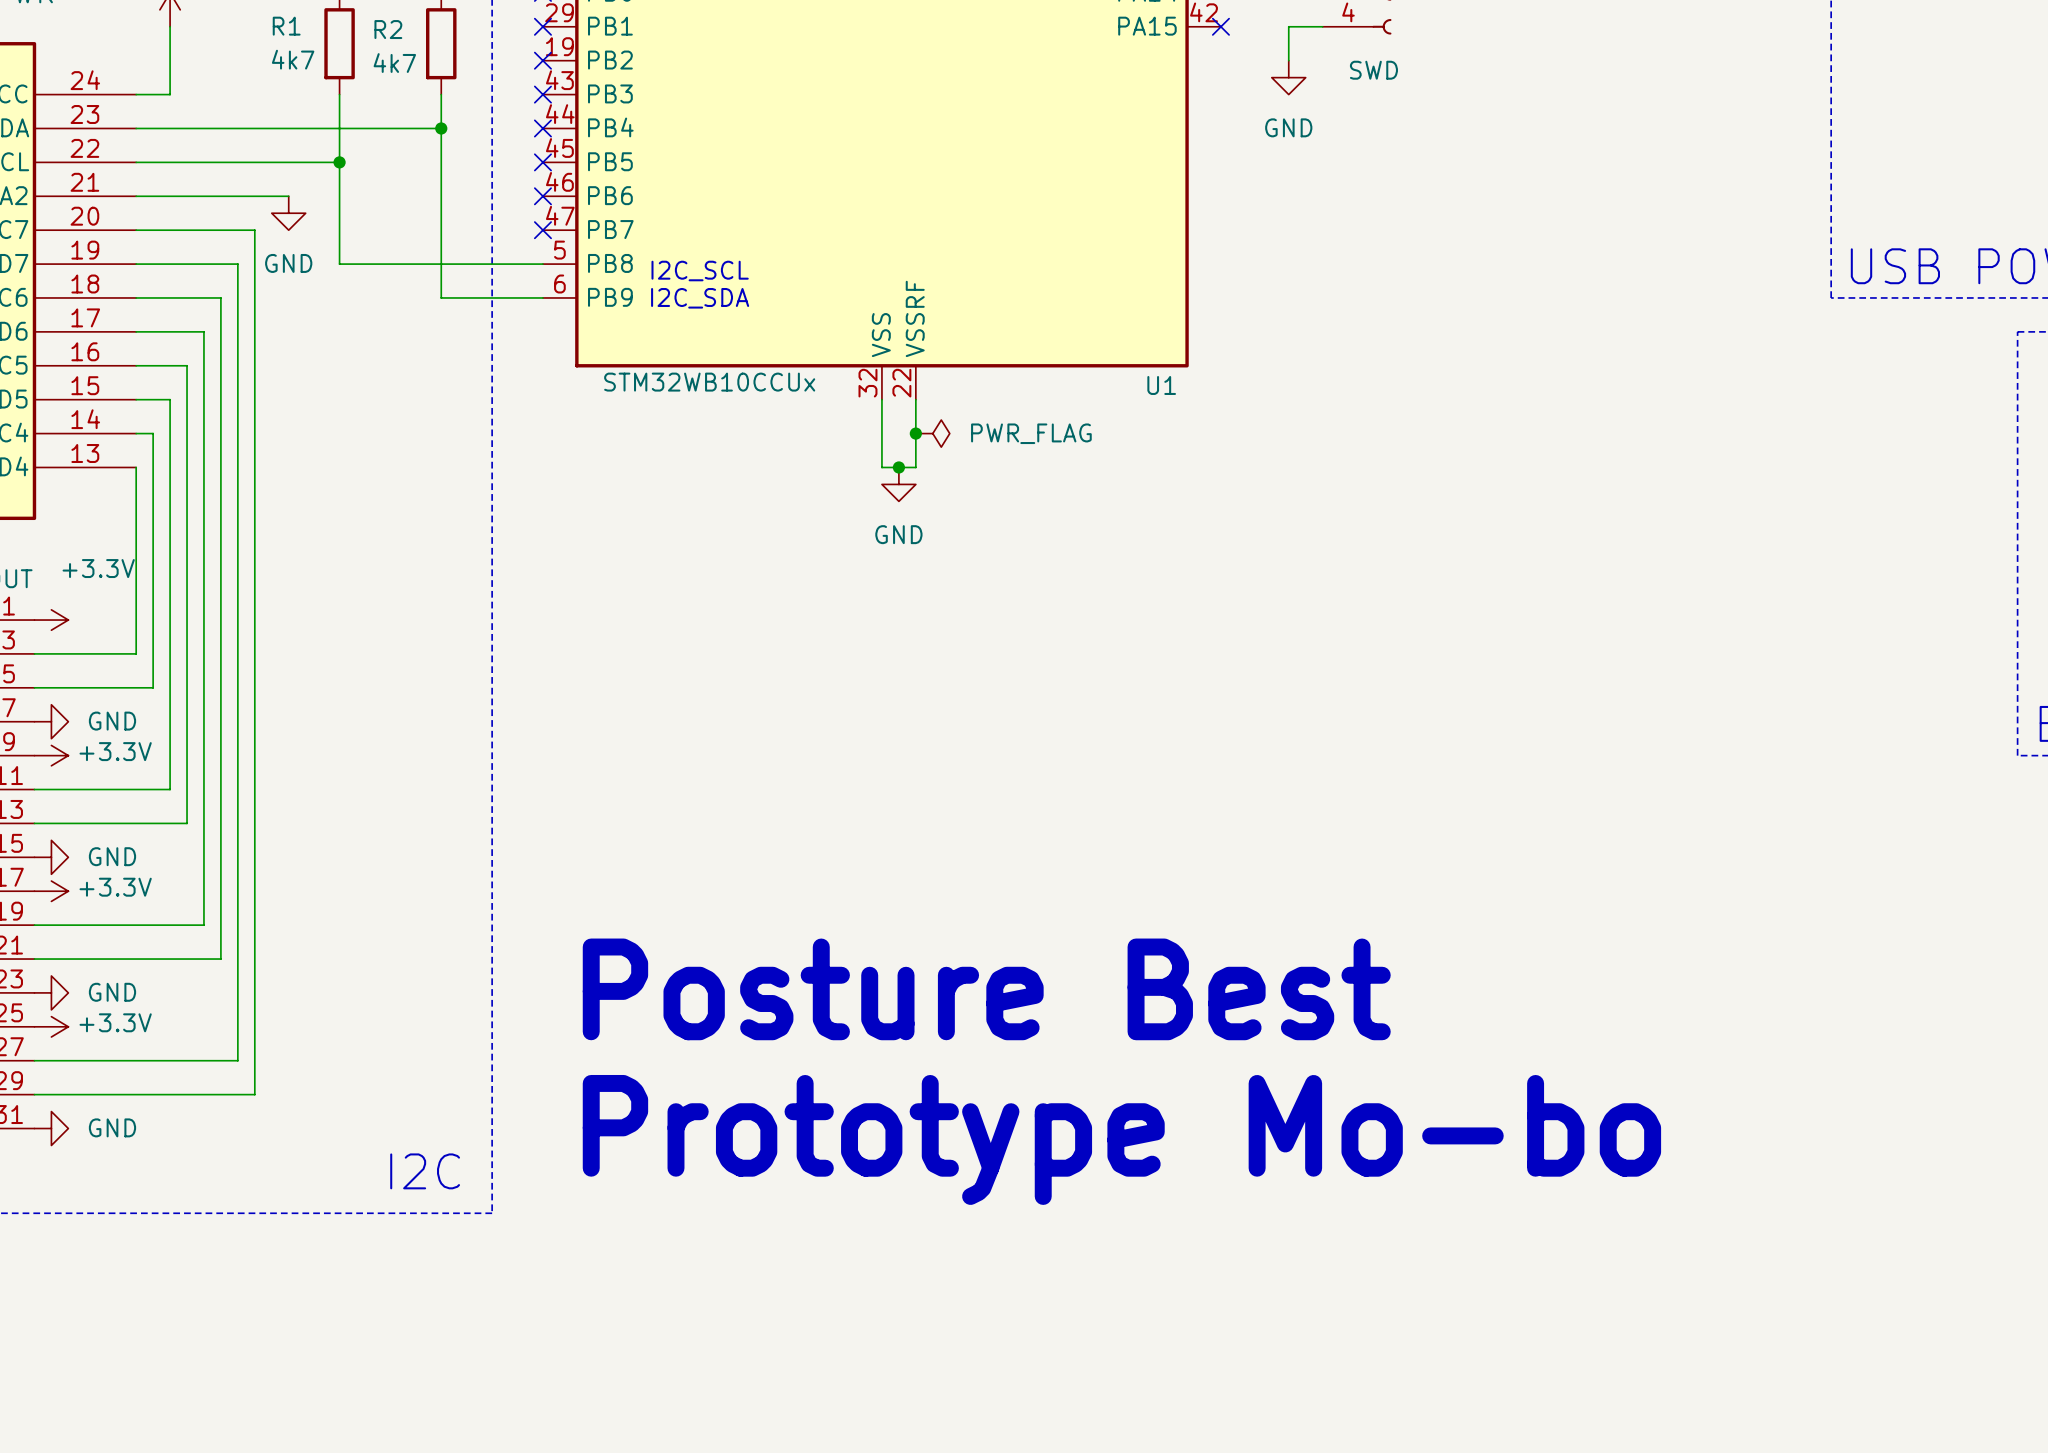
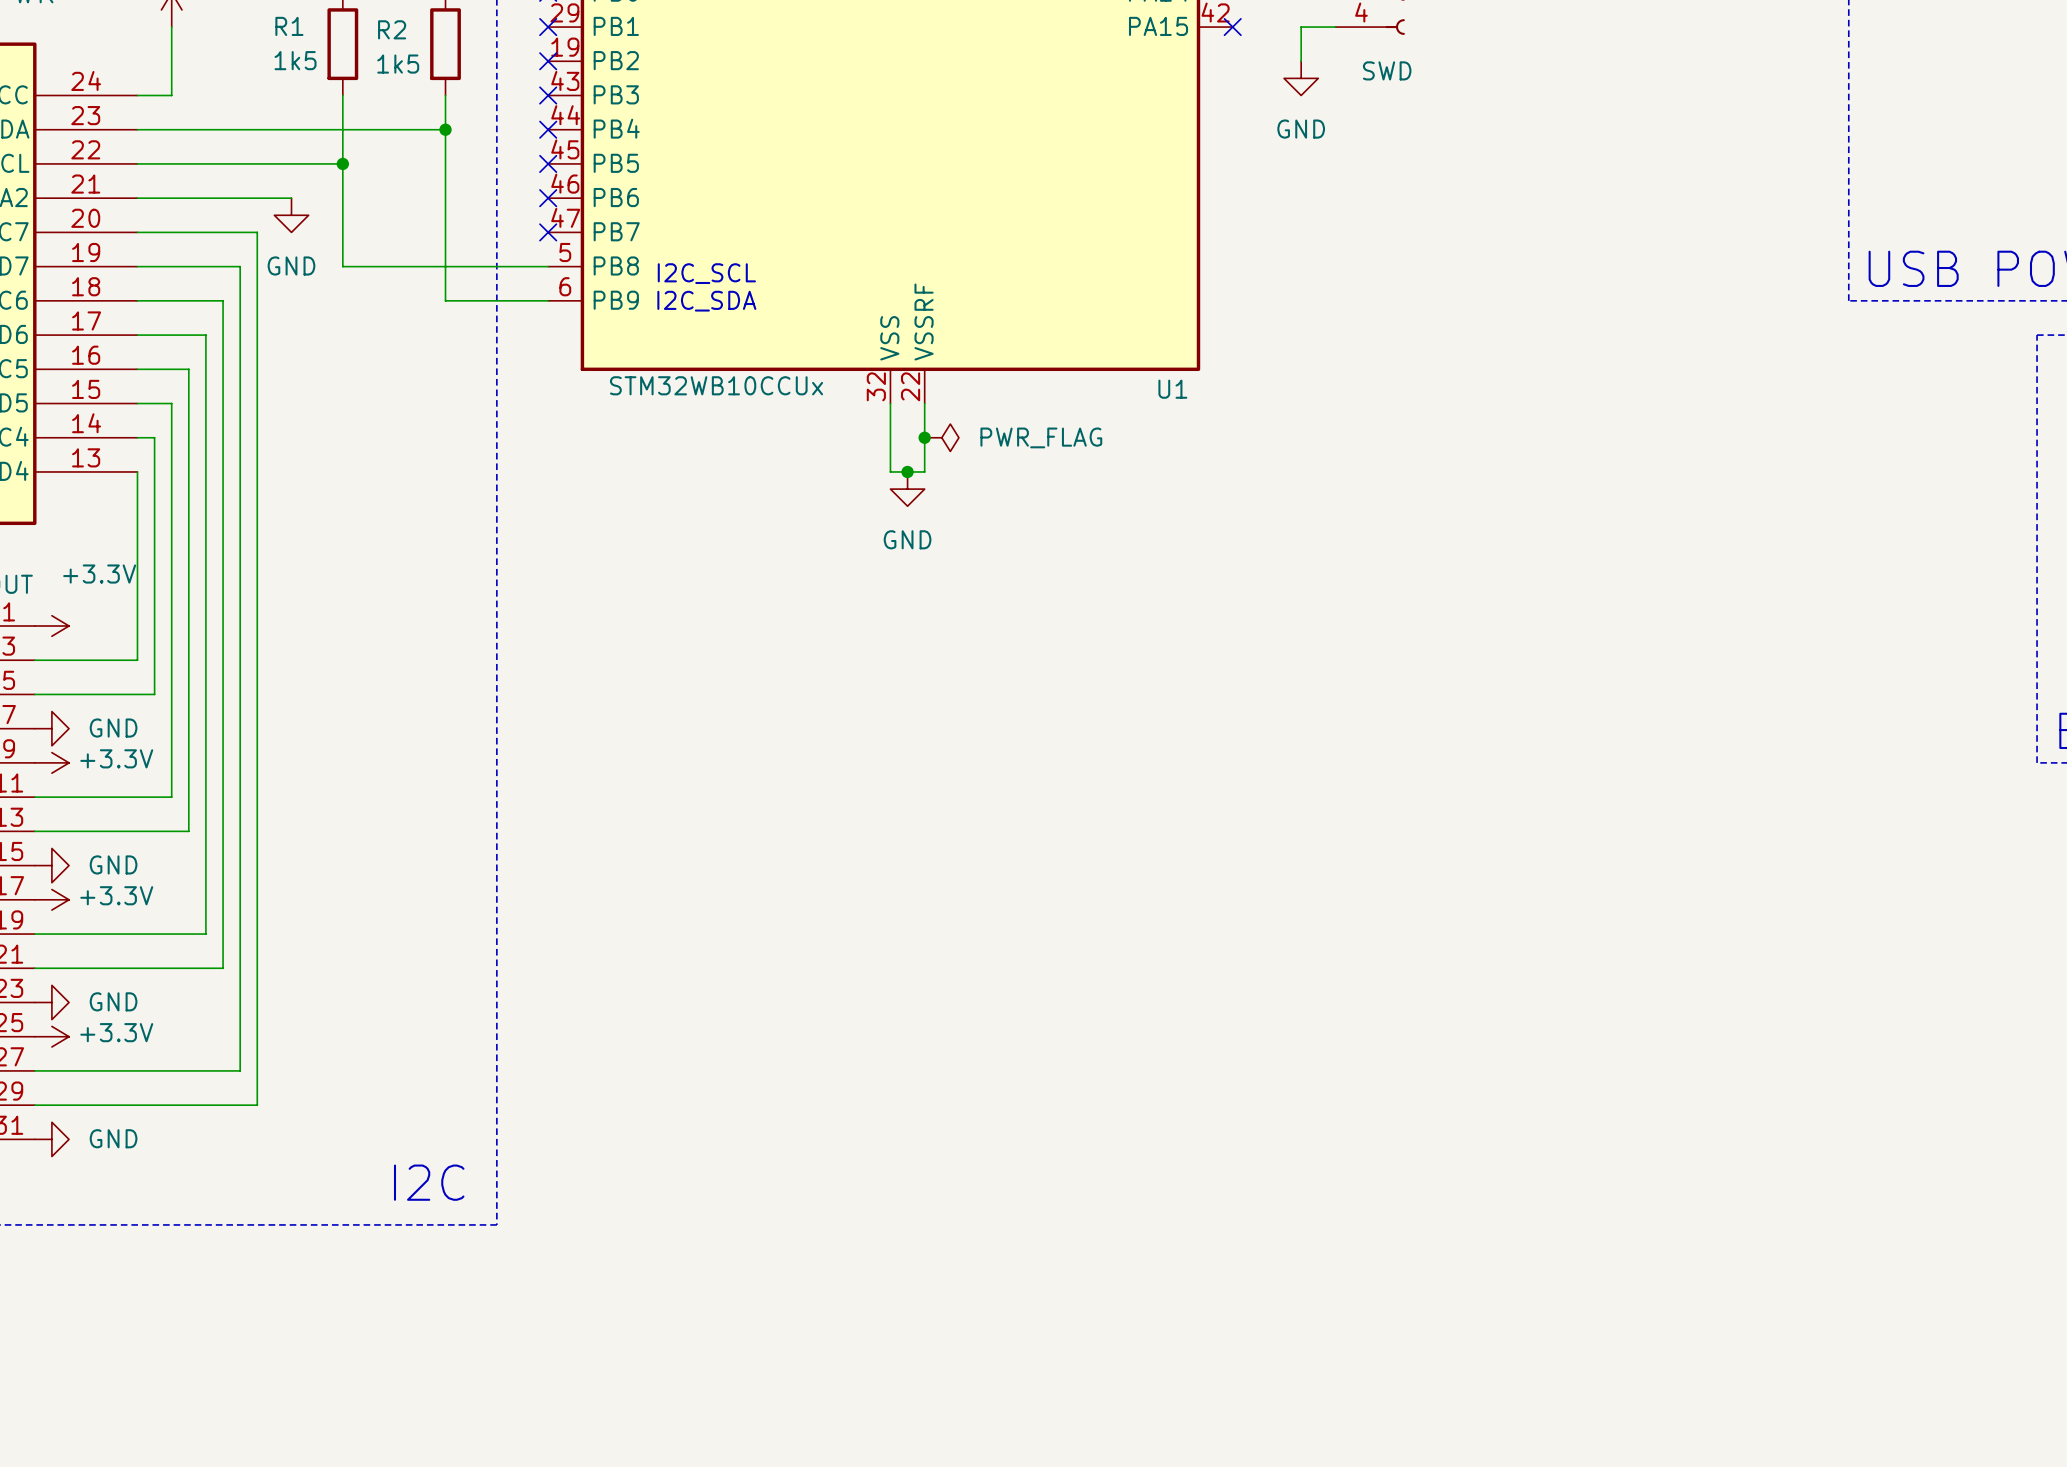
R1 value: 4k7 (293, 59) -> 1k5 (295, 60)
R2 value: 4k7 (394, 63) -> 1k5 (398, 64)
text: Posture Best (986, 989) -> none
text: Prototype Mo-bo (1121, 1139) -> none

